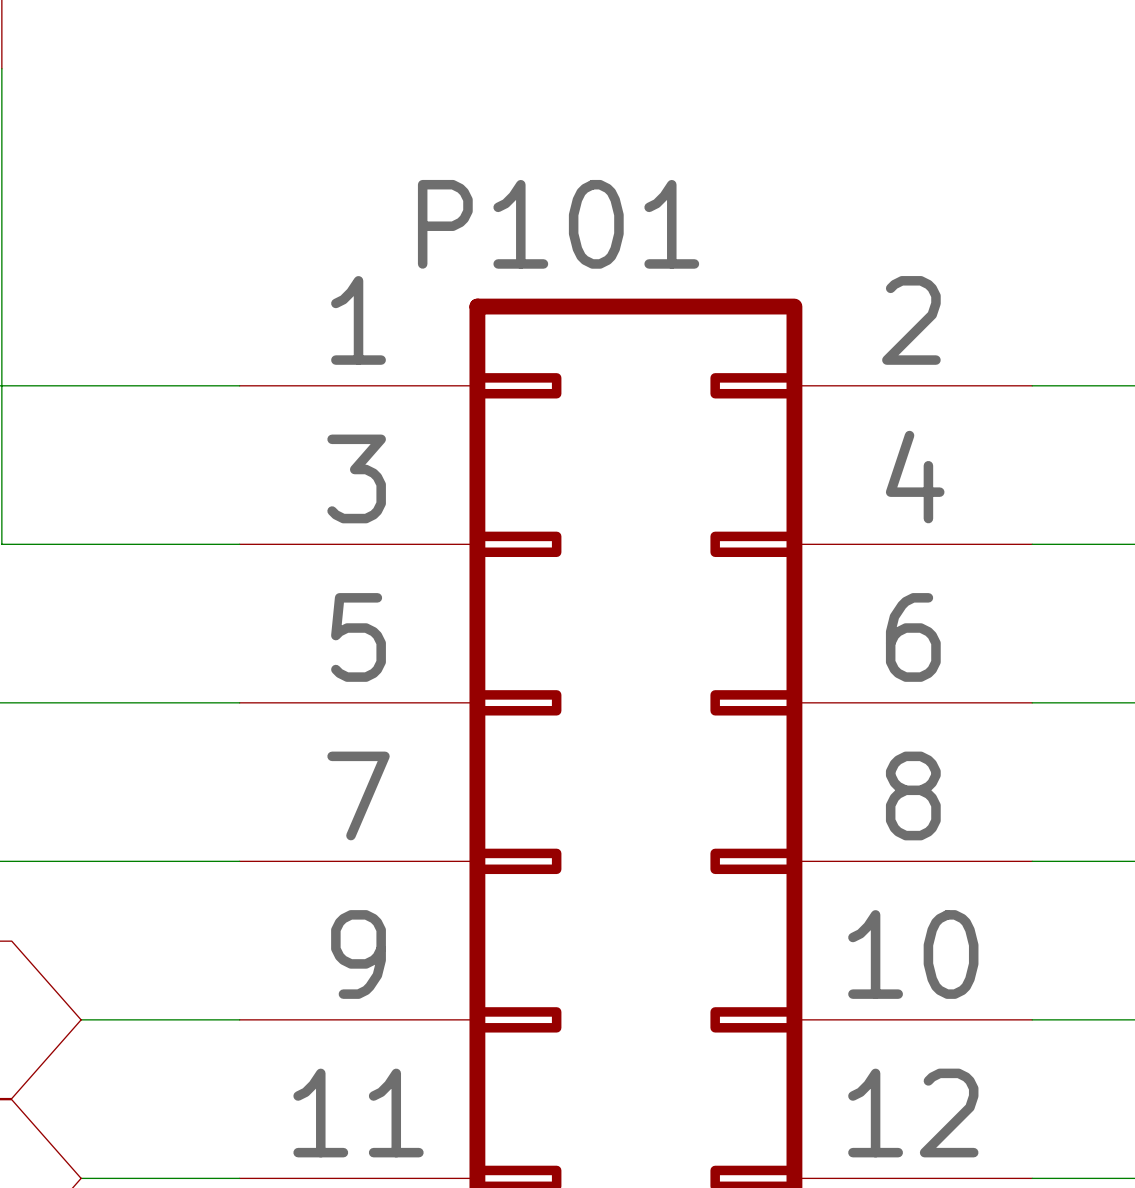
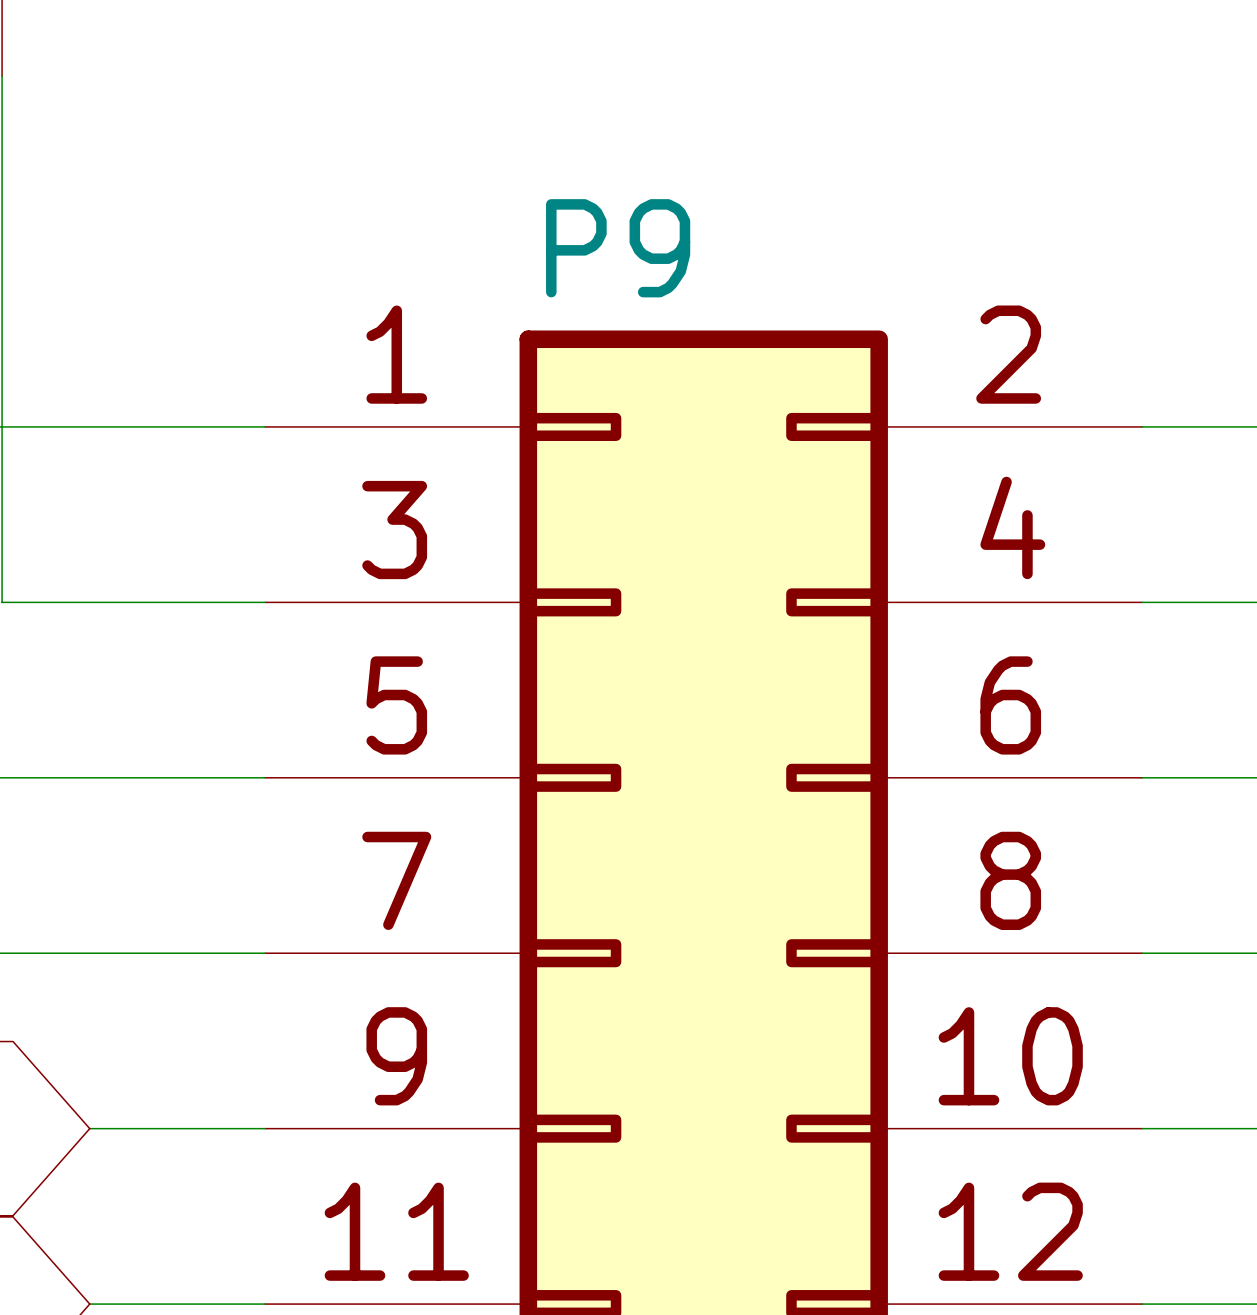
P101 name: P101 (558, 224) -> P9 (618, 248)

